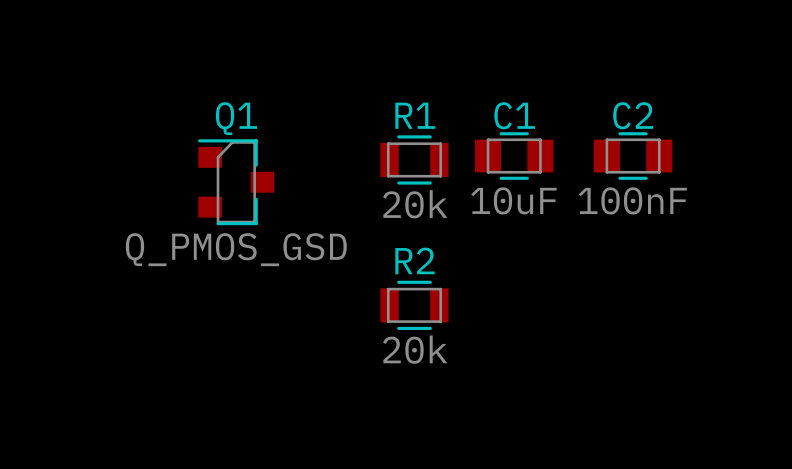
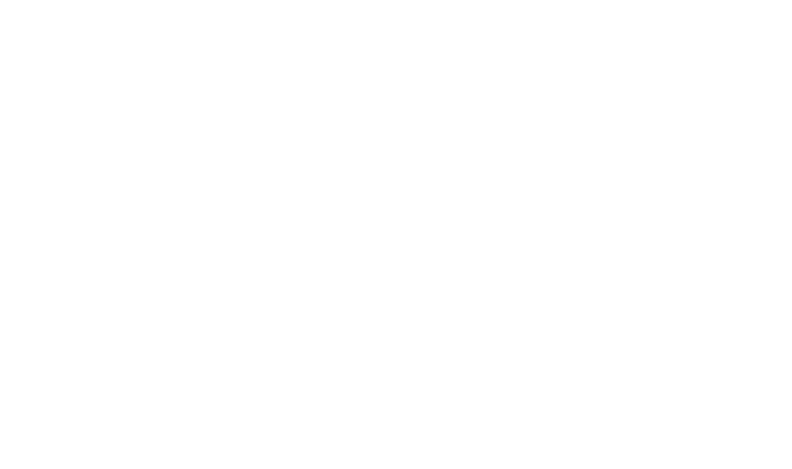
C1: 10uF (514, 156) -> none
C2: 100nF (633, 156) -> none
R1: 20k (414, 159) -> none
Q1: Q_PMOS_GSD (236, 182) -> none
R2: 20k (414, 305) -> none

